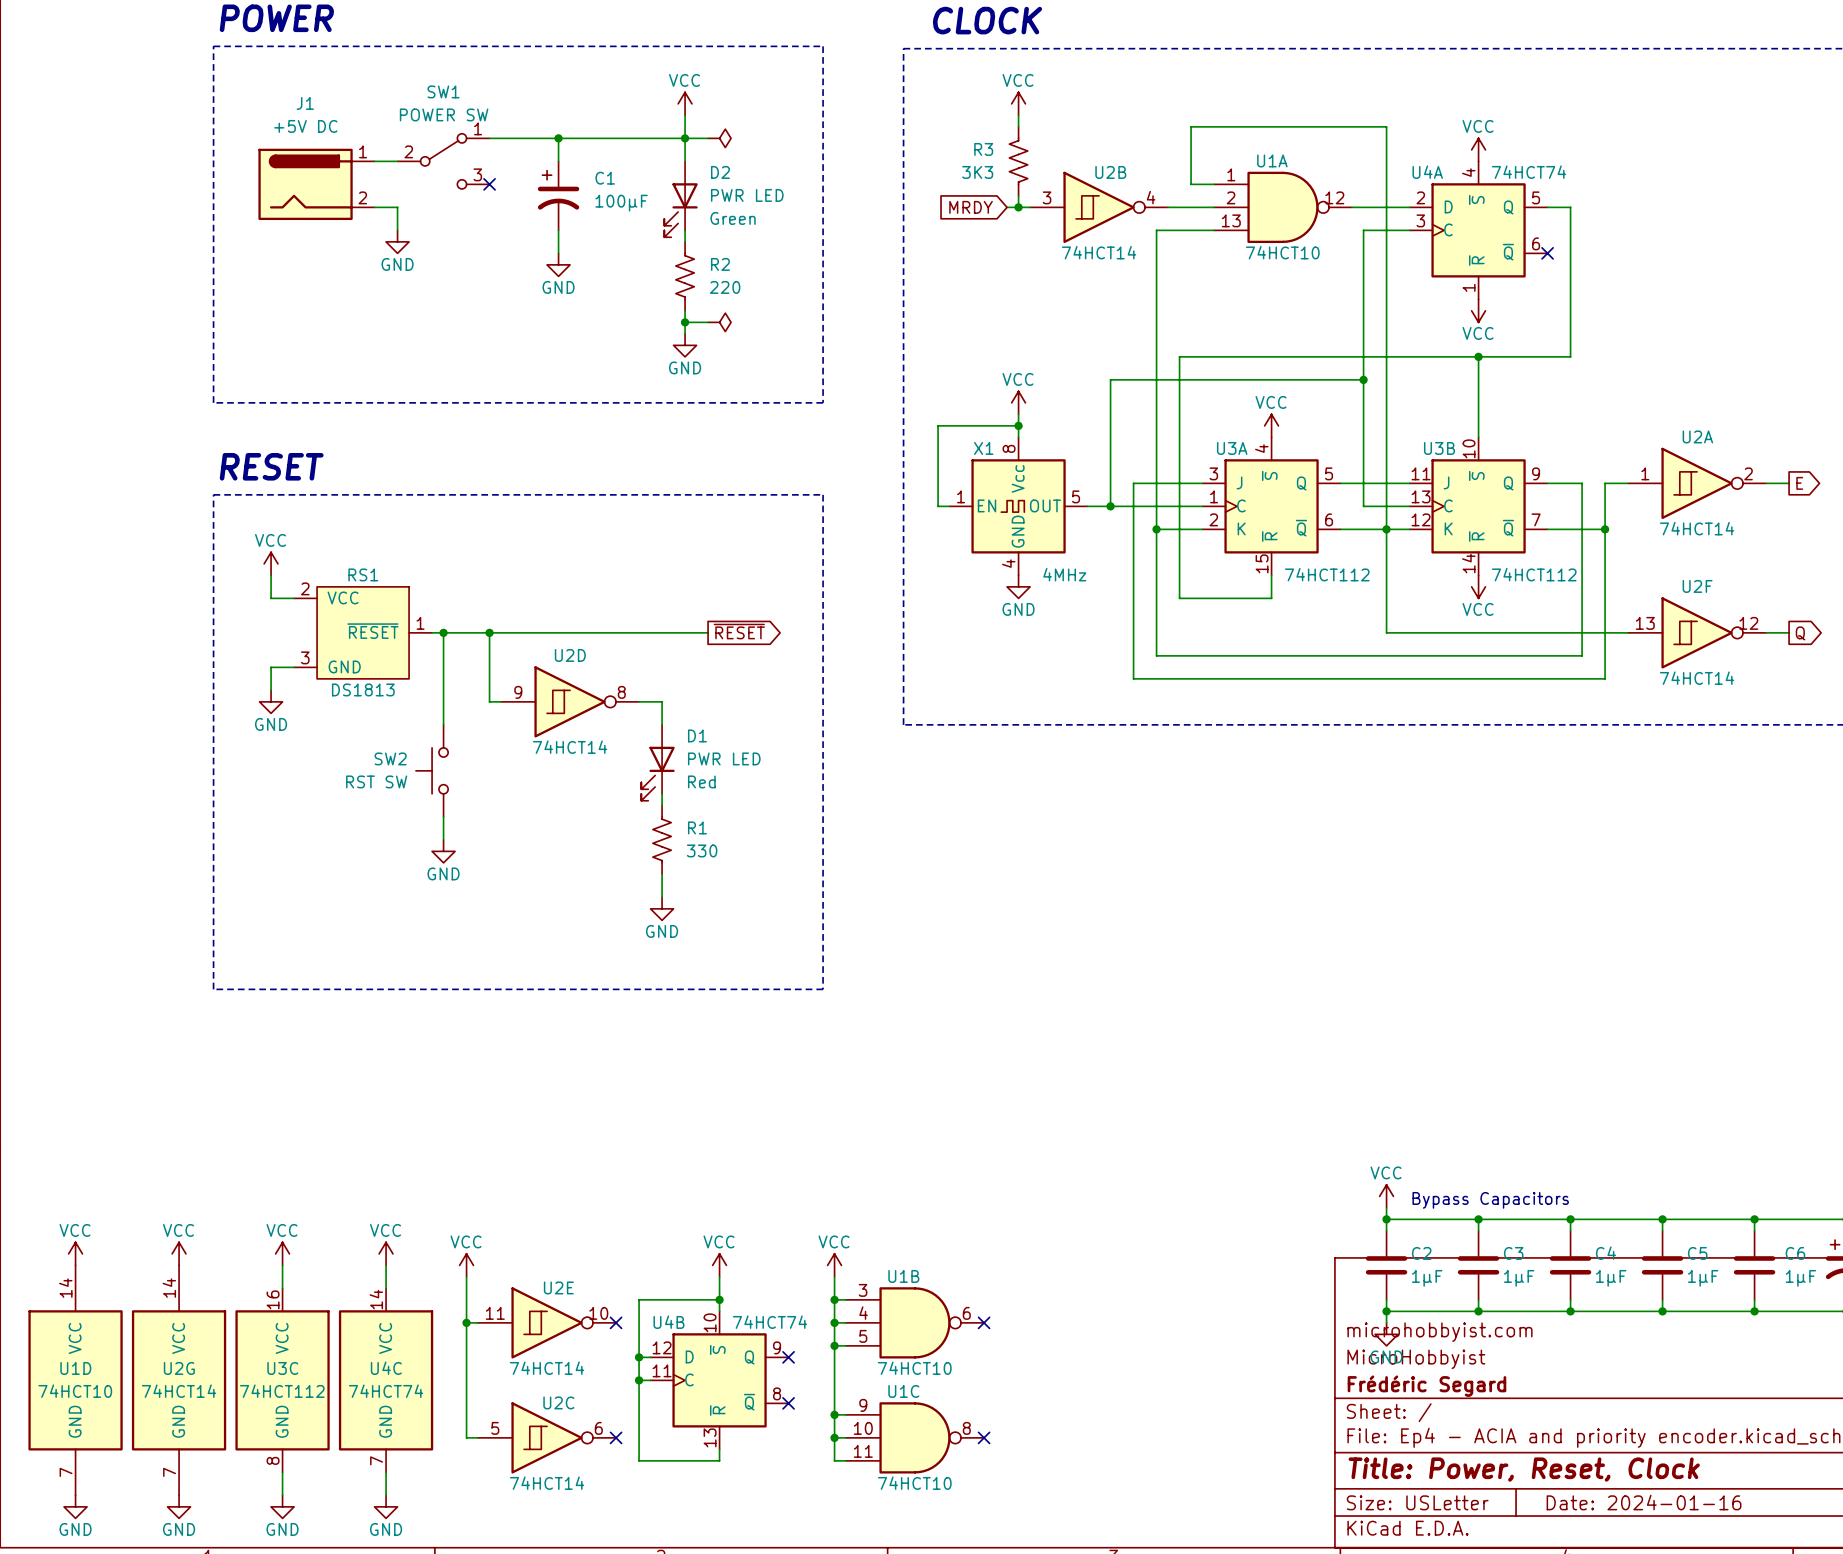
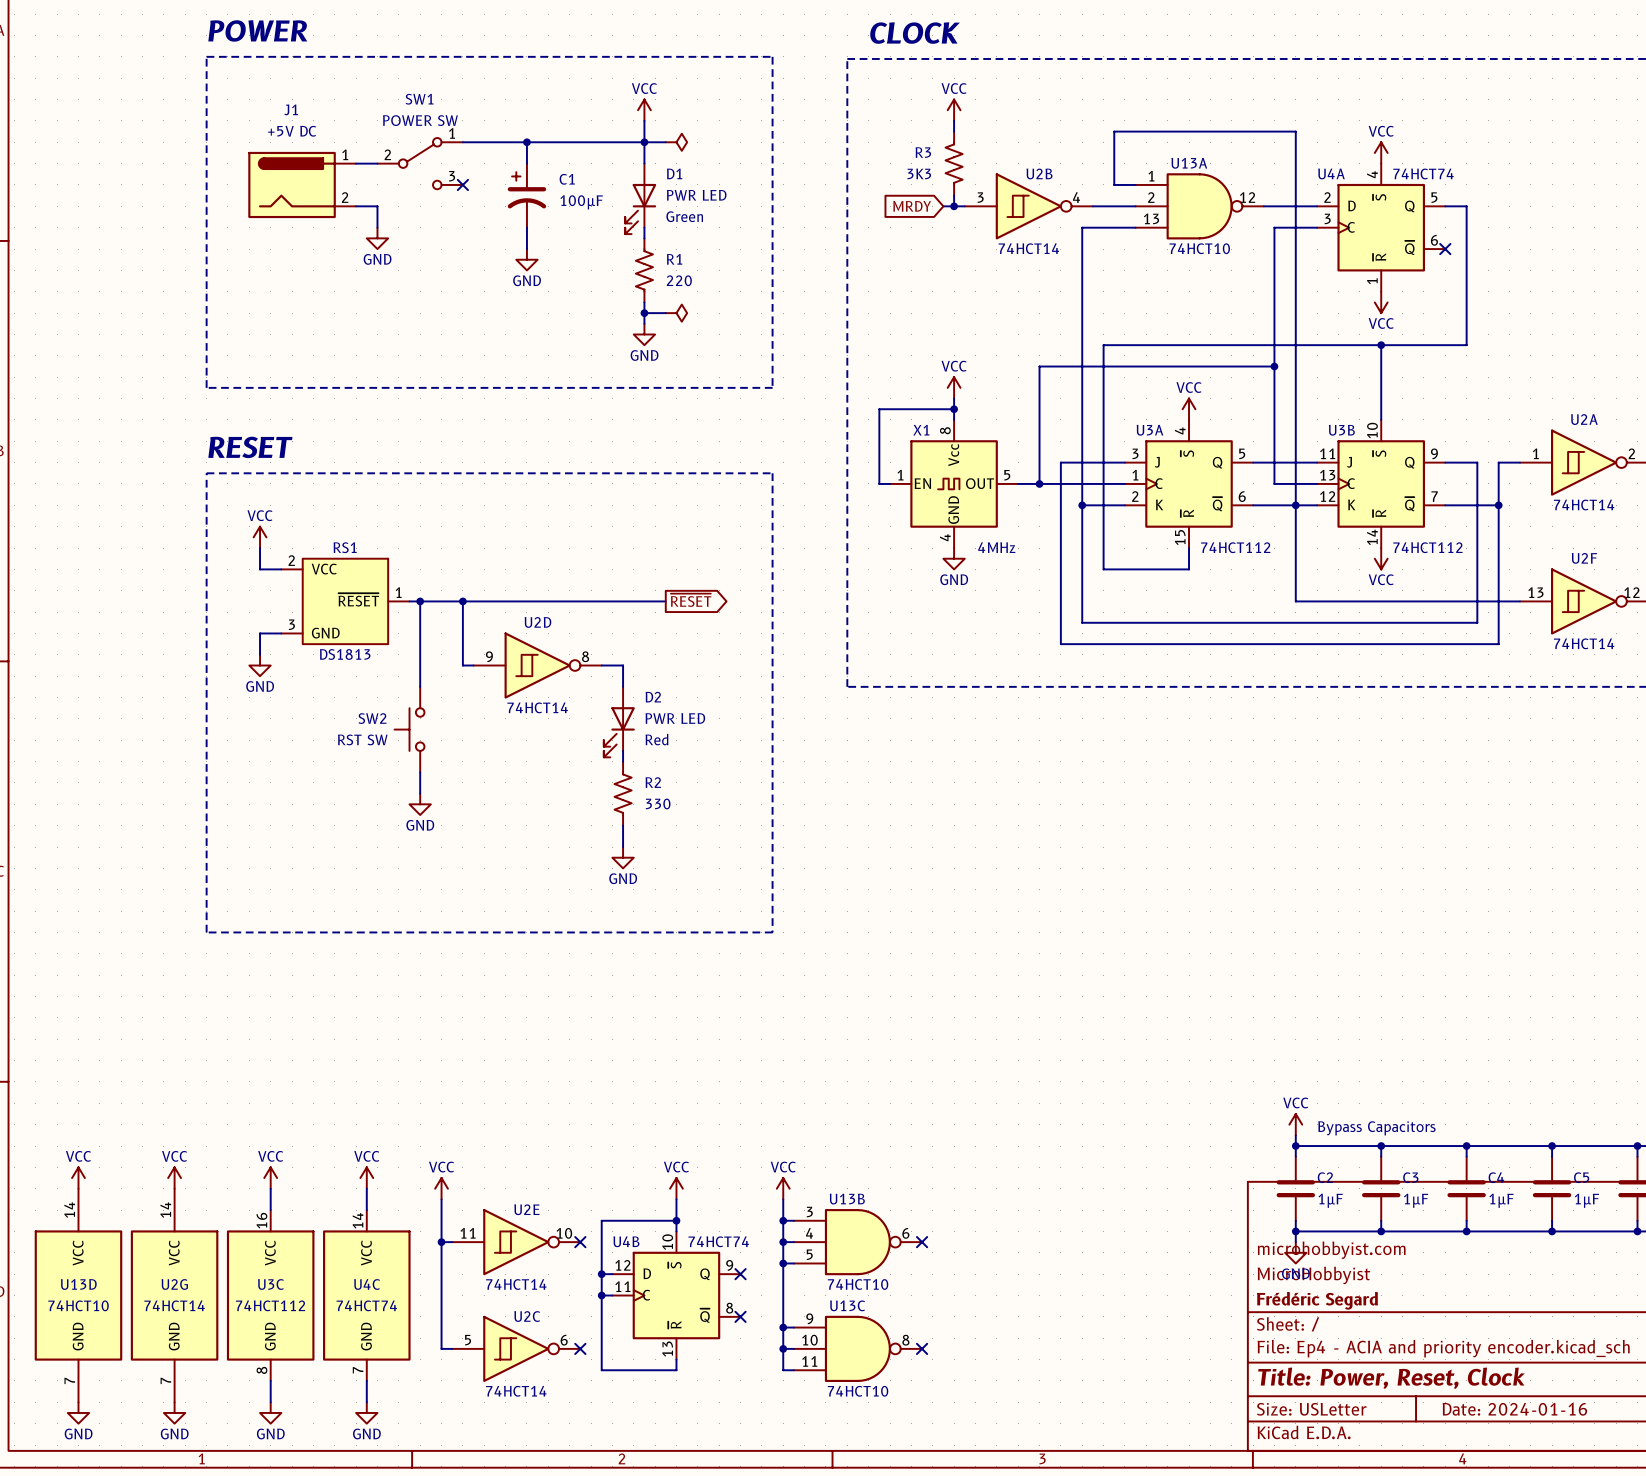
U1A name: U1A (1272, 160) -> U13A (1189, 163)
D2 name: D2 (720, 172) -> D1 (674, 173)
R2 name: R2 (720, 264) -> R1 (674, 259)
D1 name: D1 (697, 735) -> D2 (653, 697)
R1 name: R1 (697, 827) -> R2 (653, 782)
U1B name: U1B (903, 1276) -> U13B (847, 1199)
U1D name: U1D (75, 1368) -> U13D (78, 1284)
U1C name: U1C (903, 1391) -> U13C (847, 1305)

